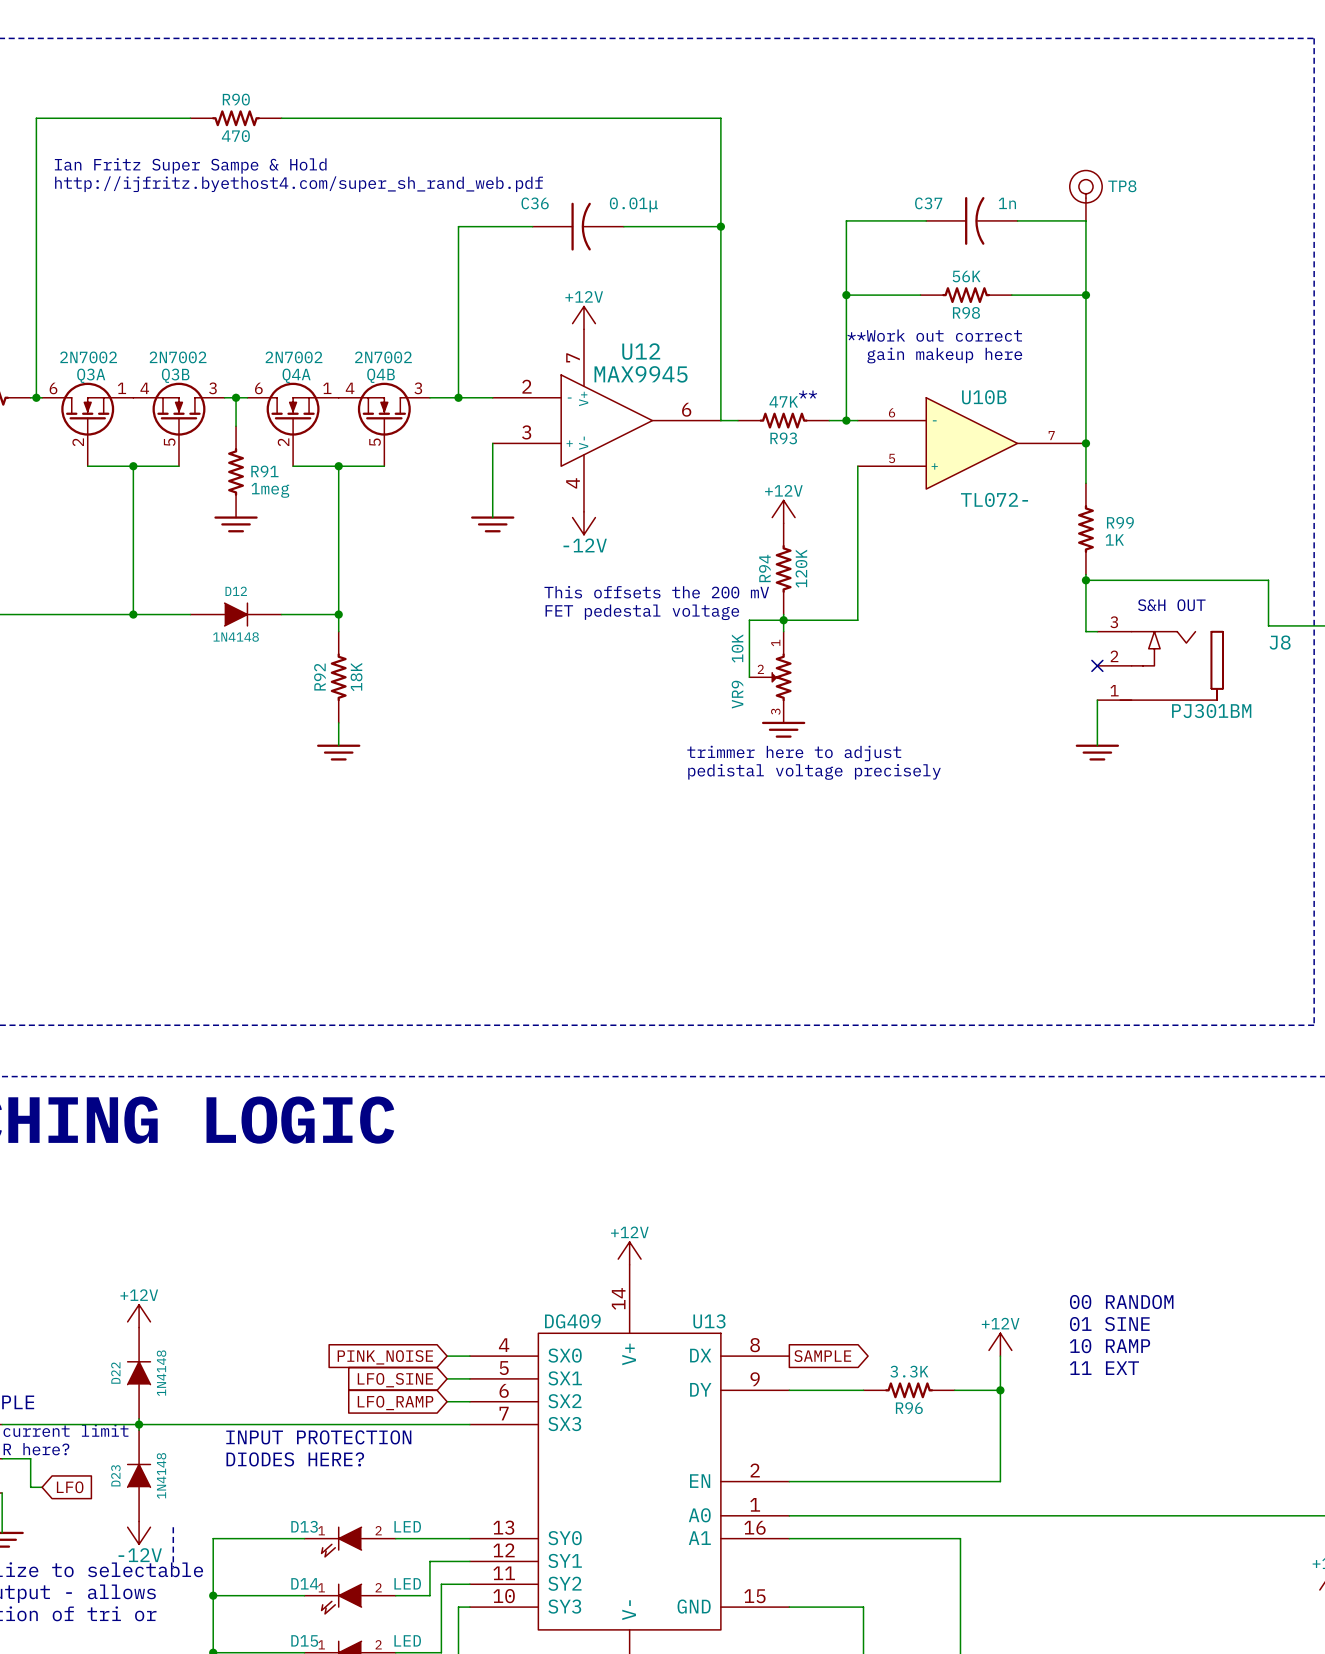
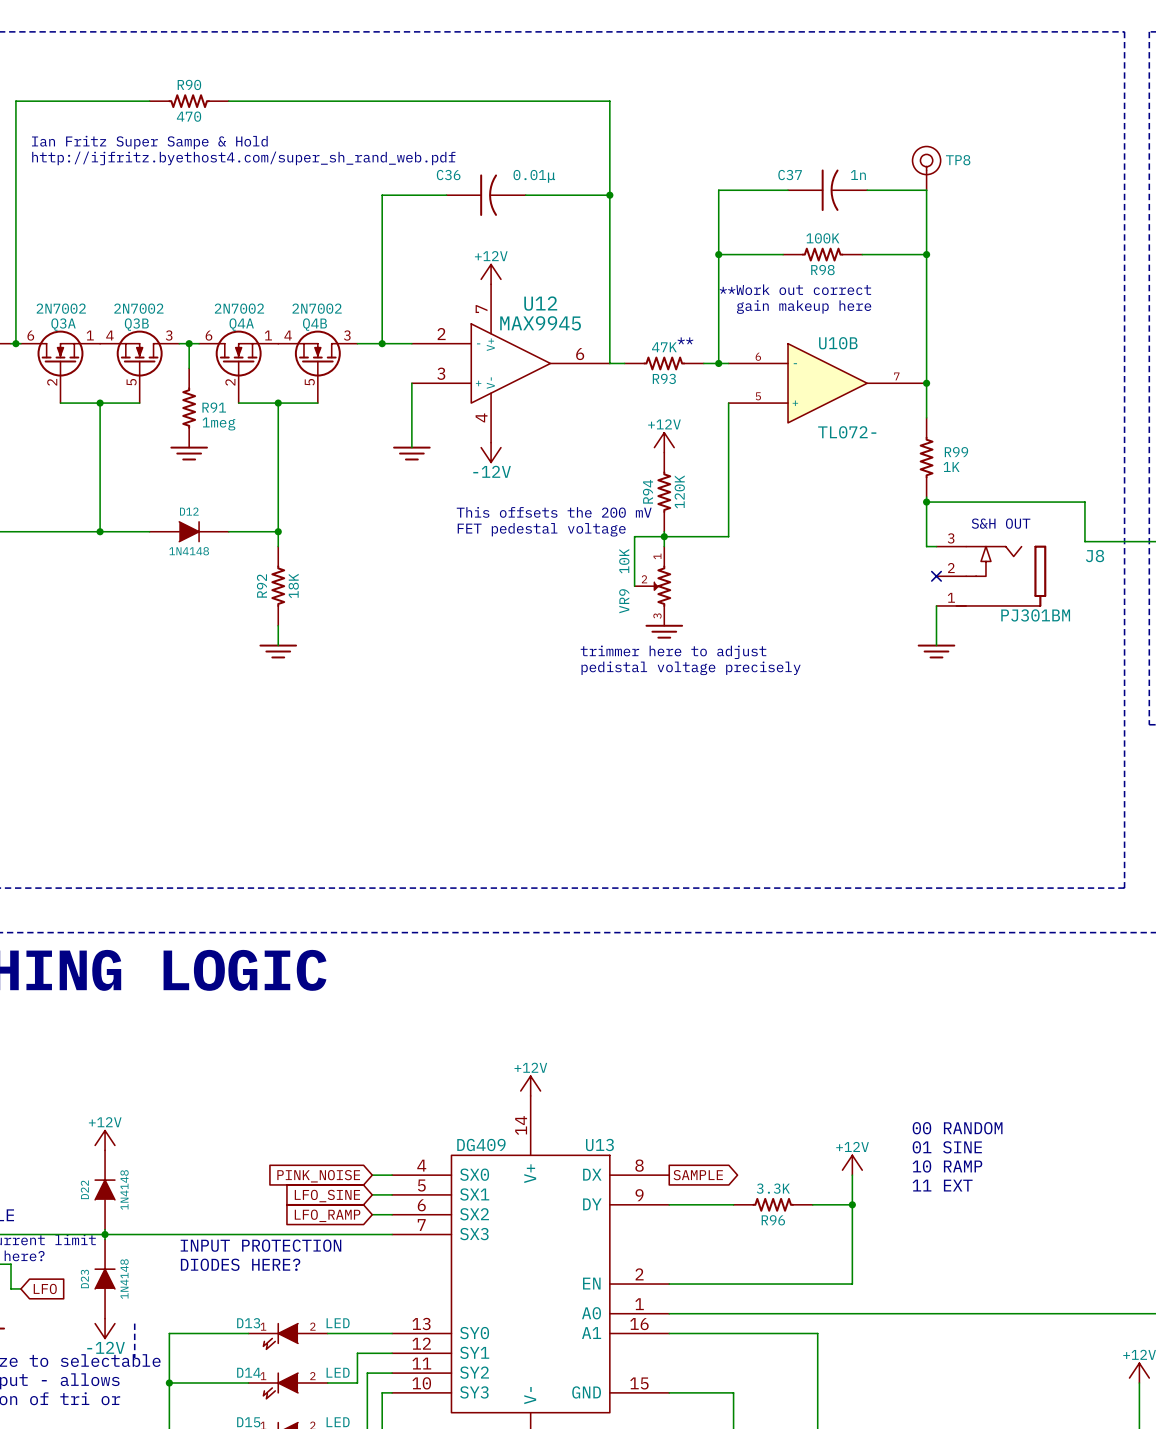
R98 value: 56K (966, 276) -> 100K (822, 238)

